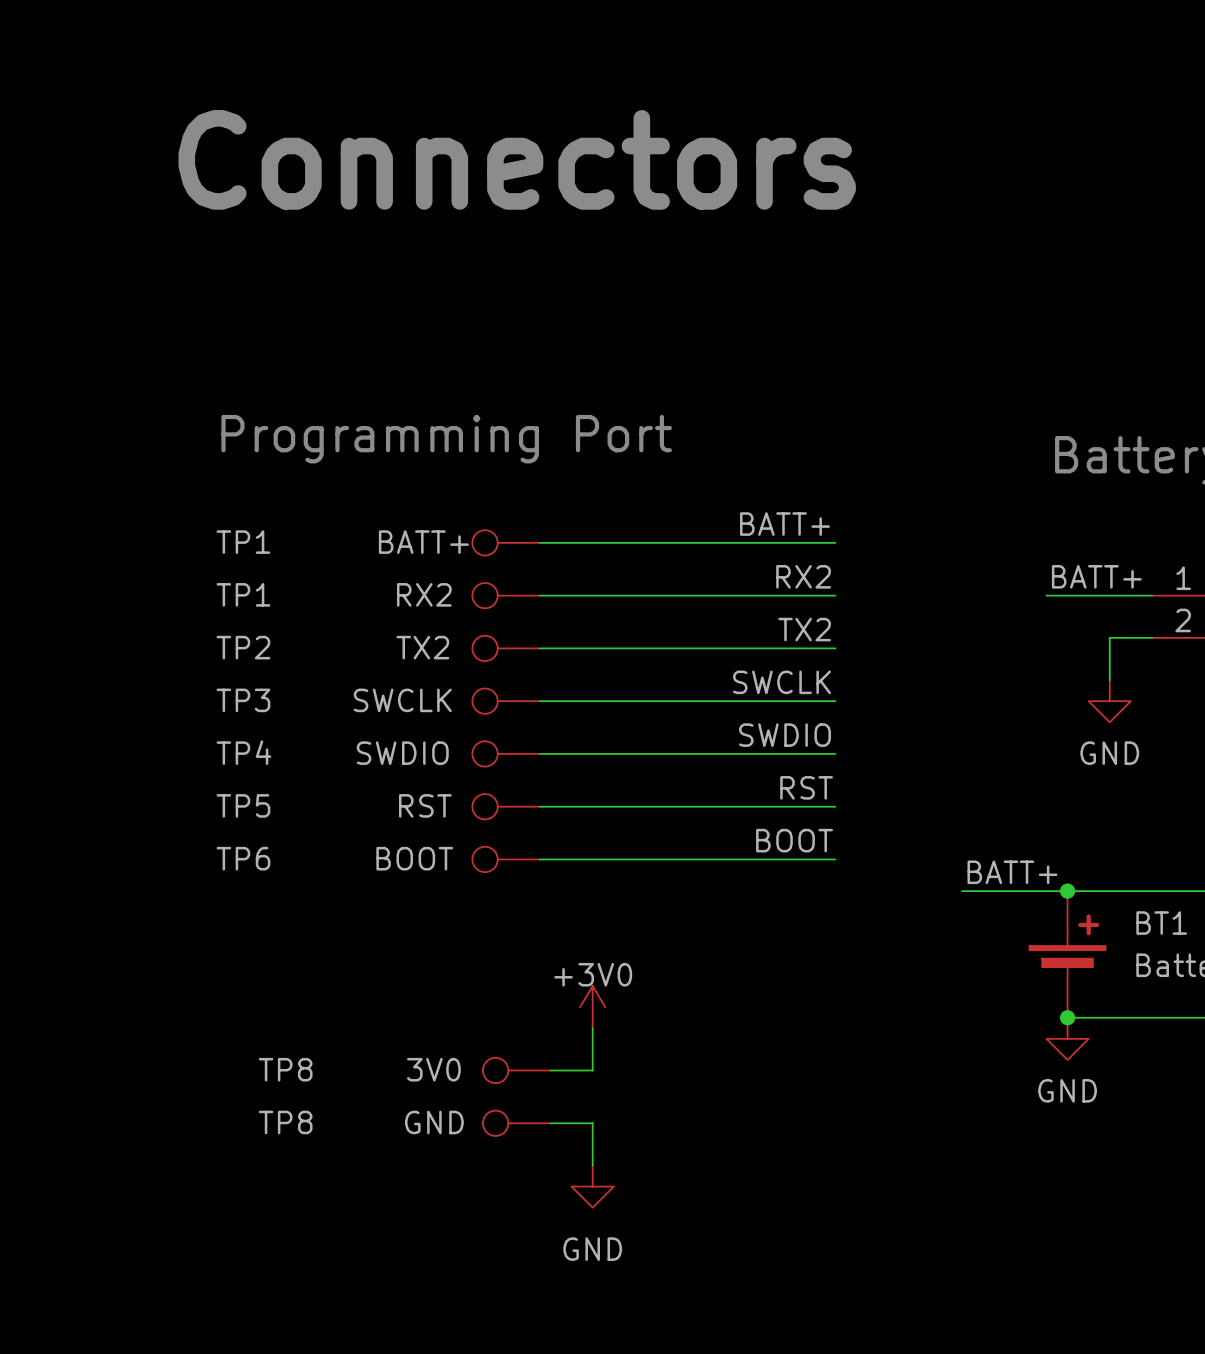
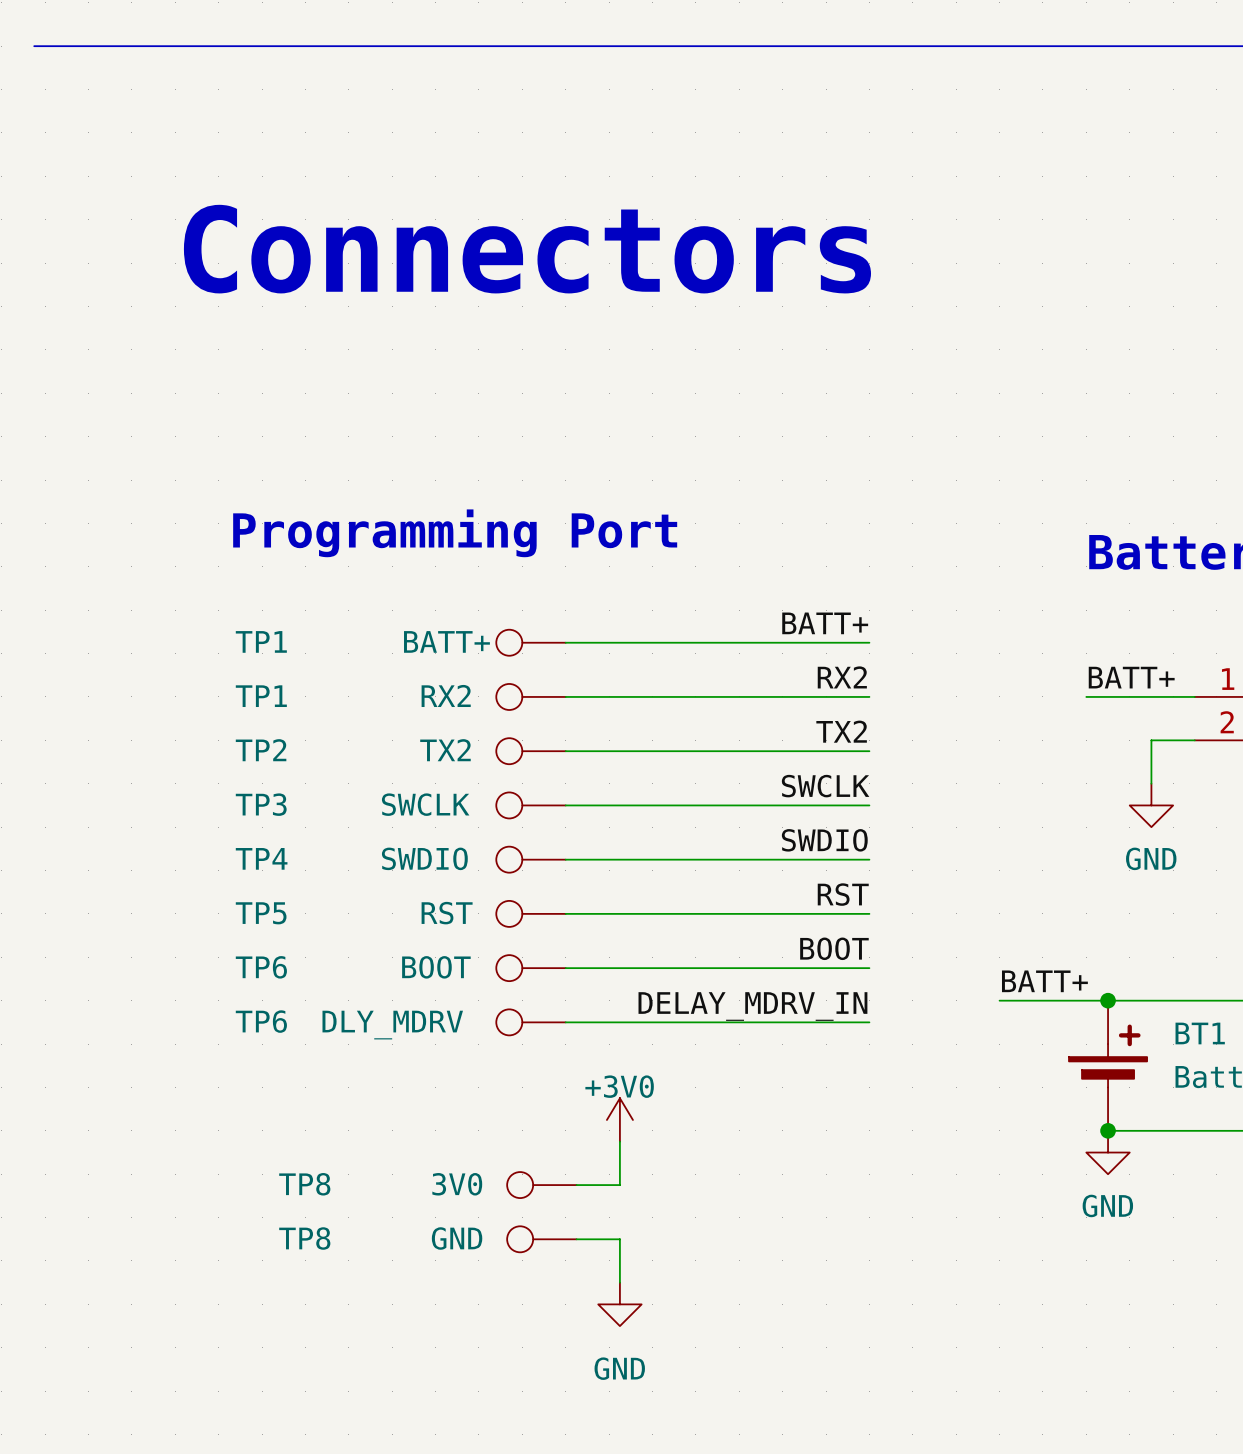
label: none -> DELAY_MDRV_IN (752, 1006)
TP6: none -> DLY_MDRV (530, 1022)
wire: none -> (565, 1022) (869, 1022)

